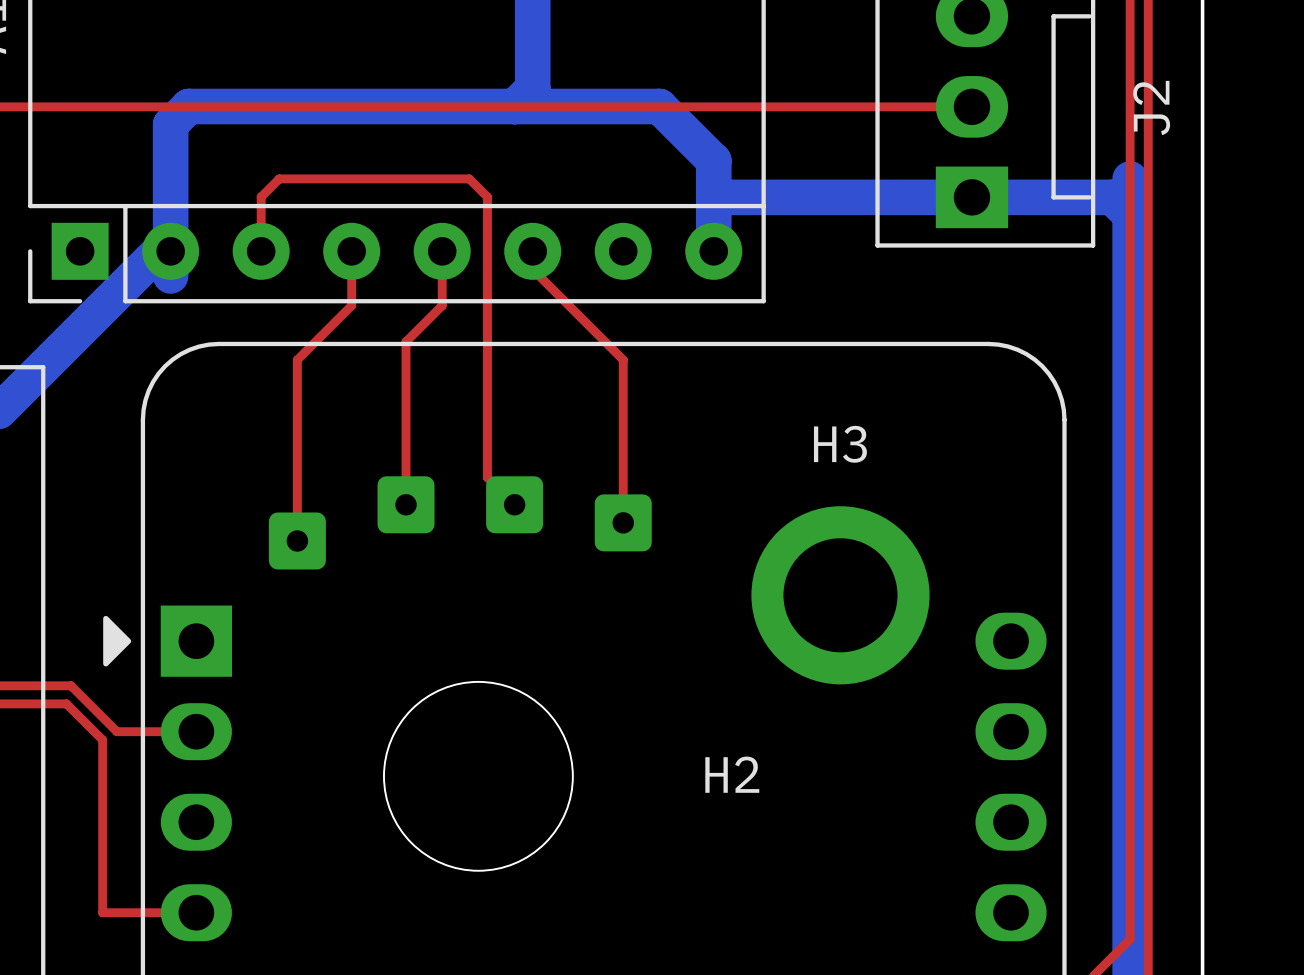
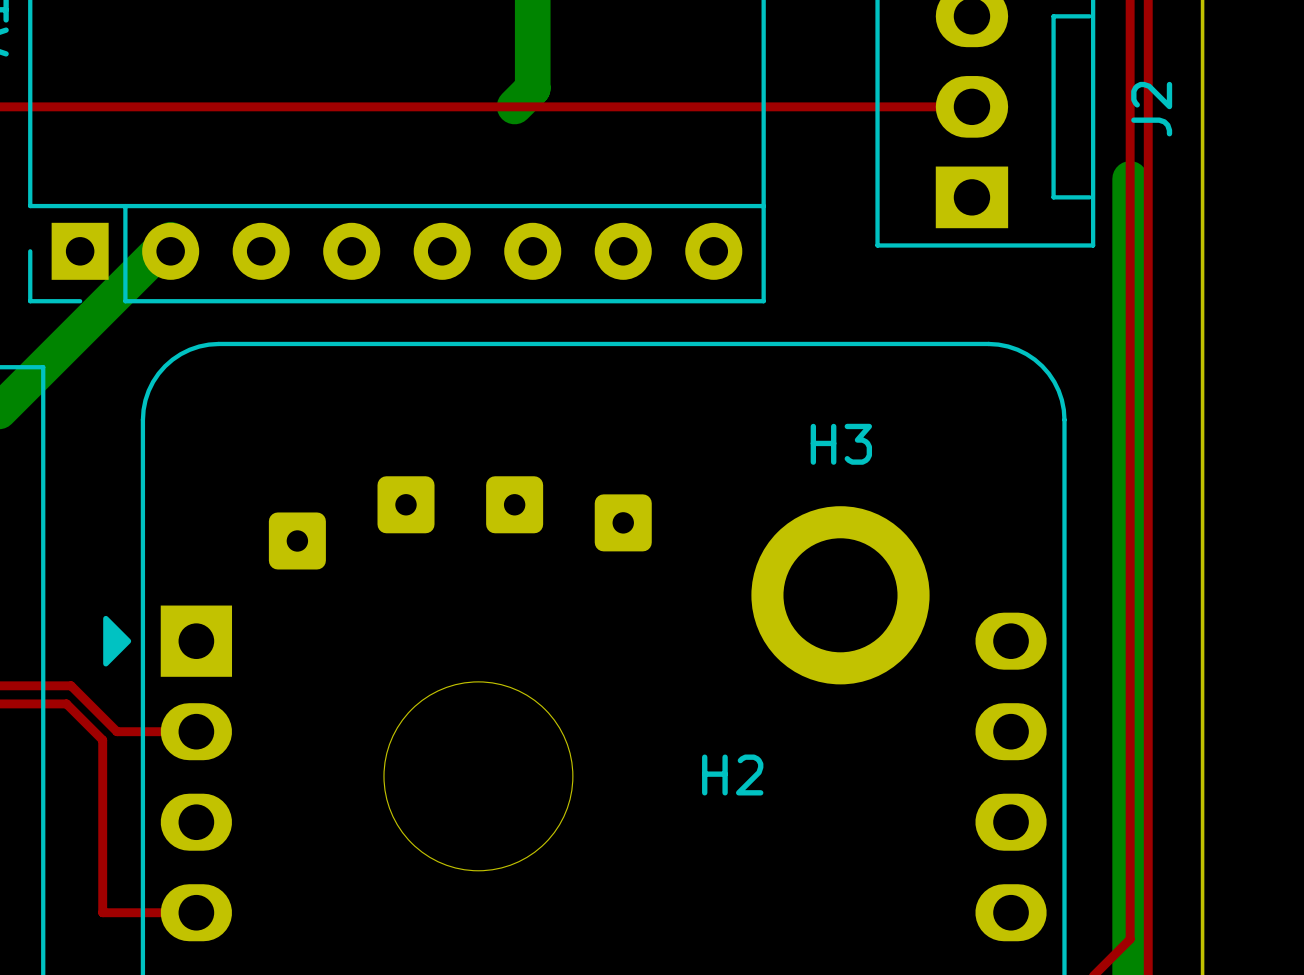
bottom track: (714, 197) (1112, 197) (1130, 215) -> none
top track: (261, 251) (261, 197) (279, 178) (469, 178) (487, 197) (487, 477) (514, 504) -> none
top track: (351, 251) (351, 305) (297, 359) (297, 540) -> none
top track: (442, 251) (442, 305) (406, 341) (406, 504) -> none
top track: (532, 251) (532, 269) (623, 359) (623, 522) -> none
bottom track: (713, 251) (713, 160) (659, 106) (188, 106) (170, 124) (170, 275) -> none

